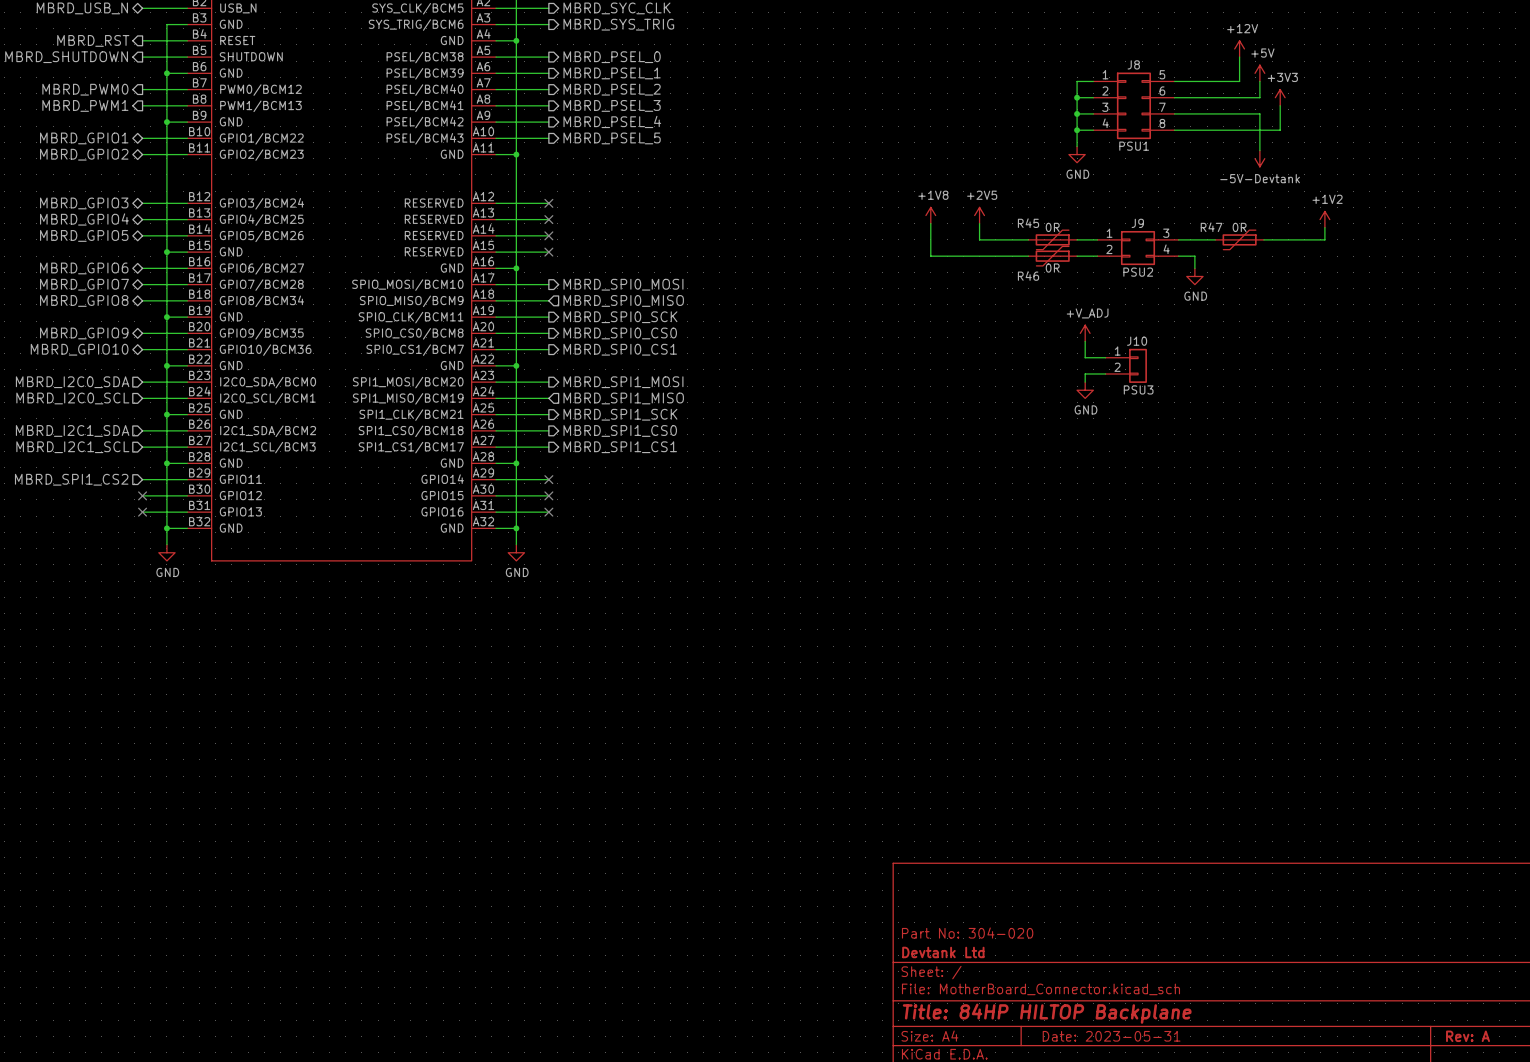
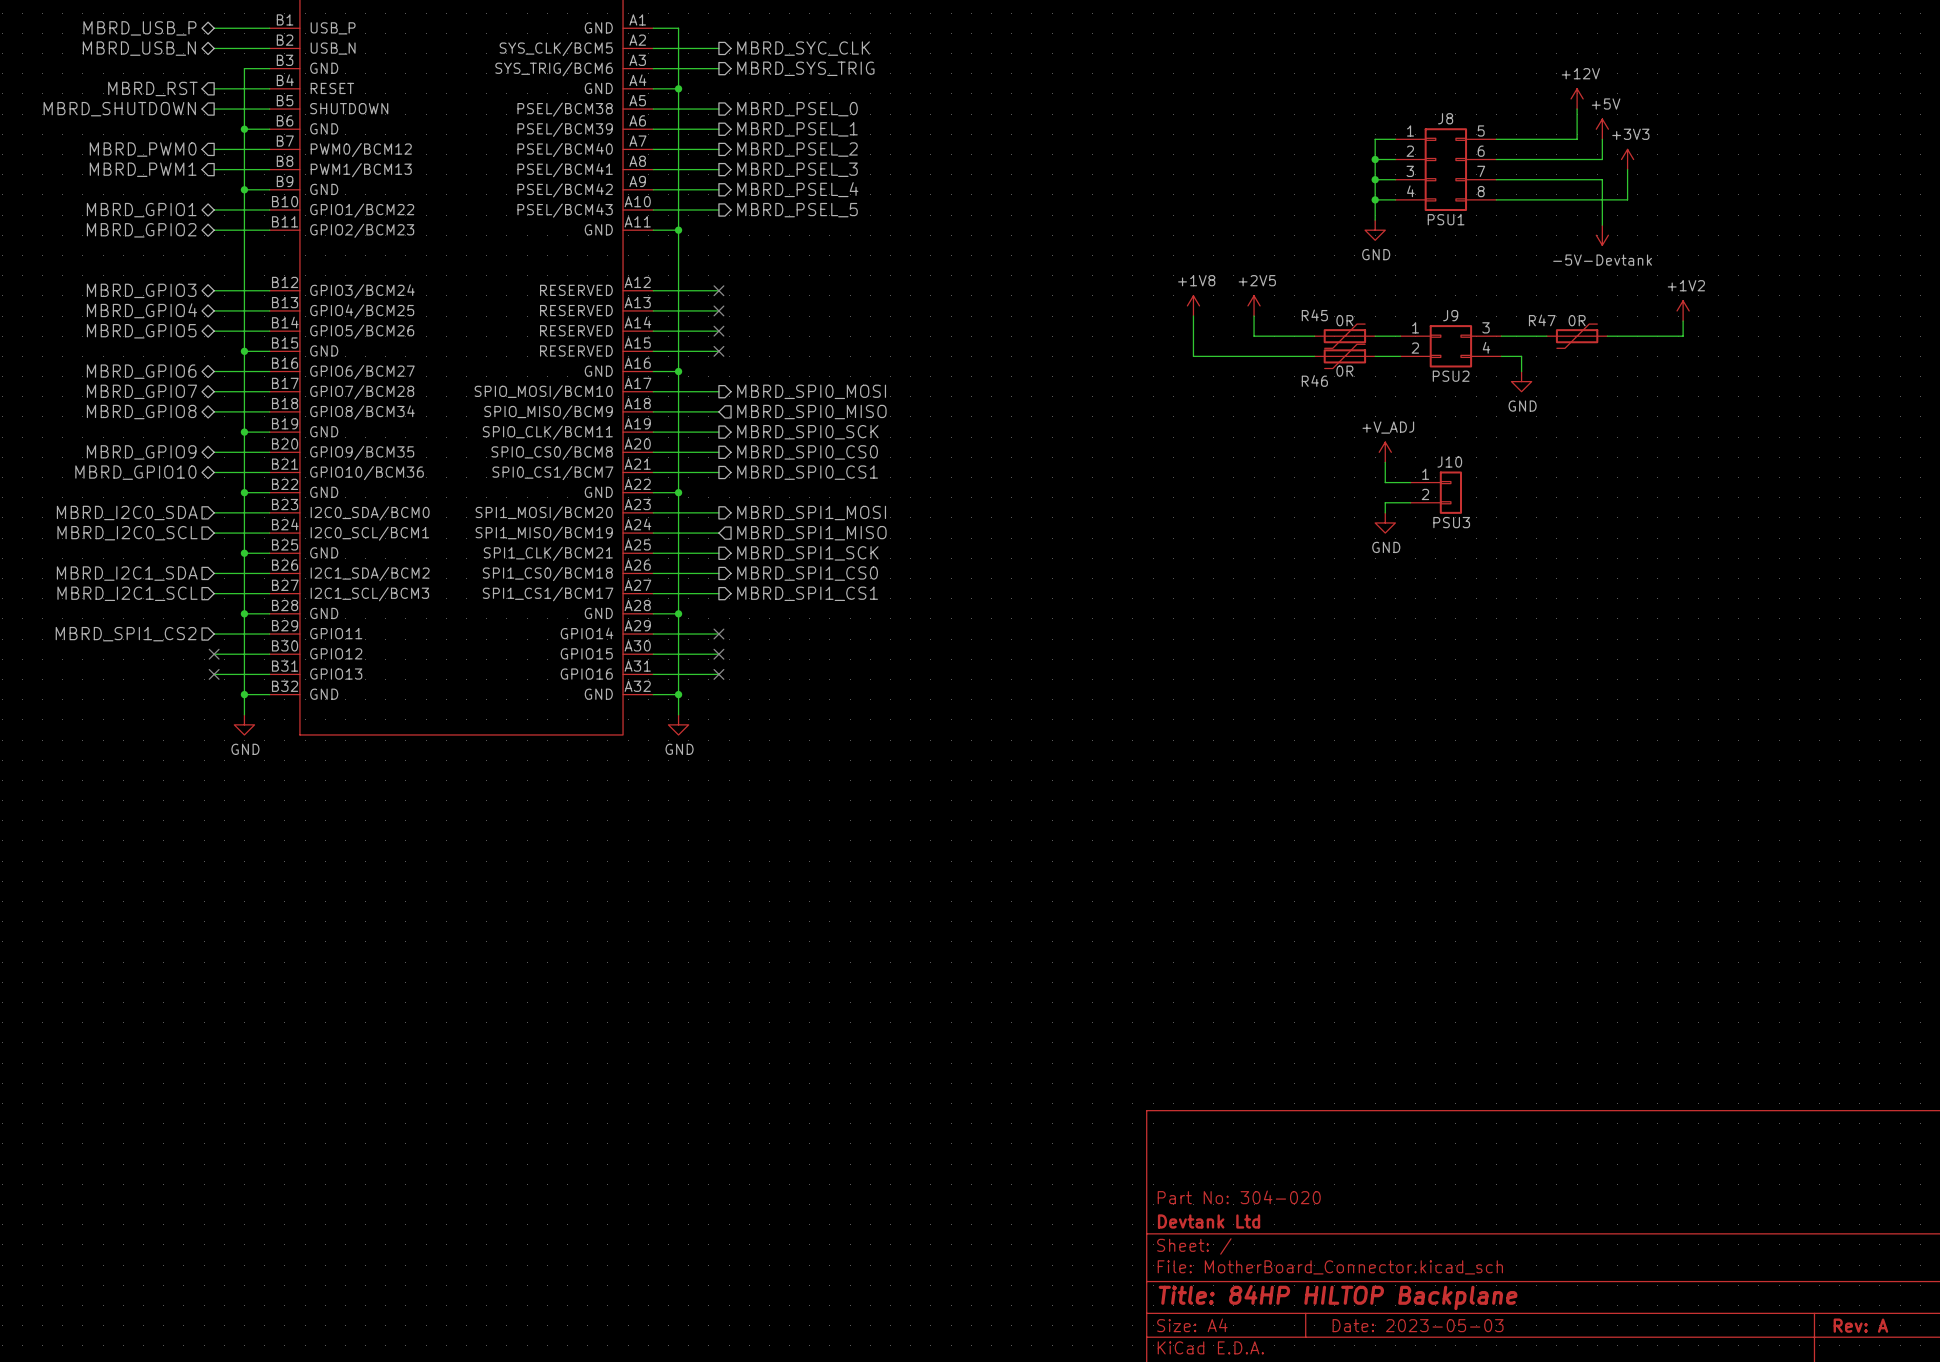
title block: Date: 2023-05-31 (1111, 1036) -> Date: 2023-05-03 (1418, 1325)

